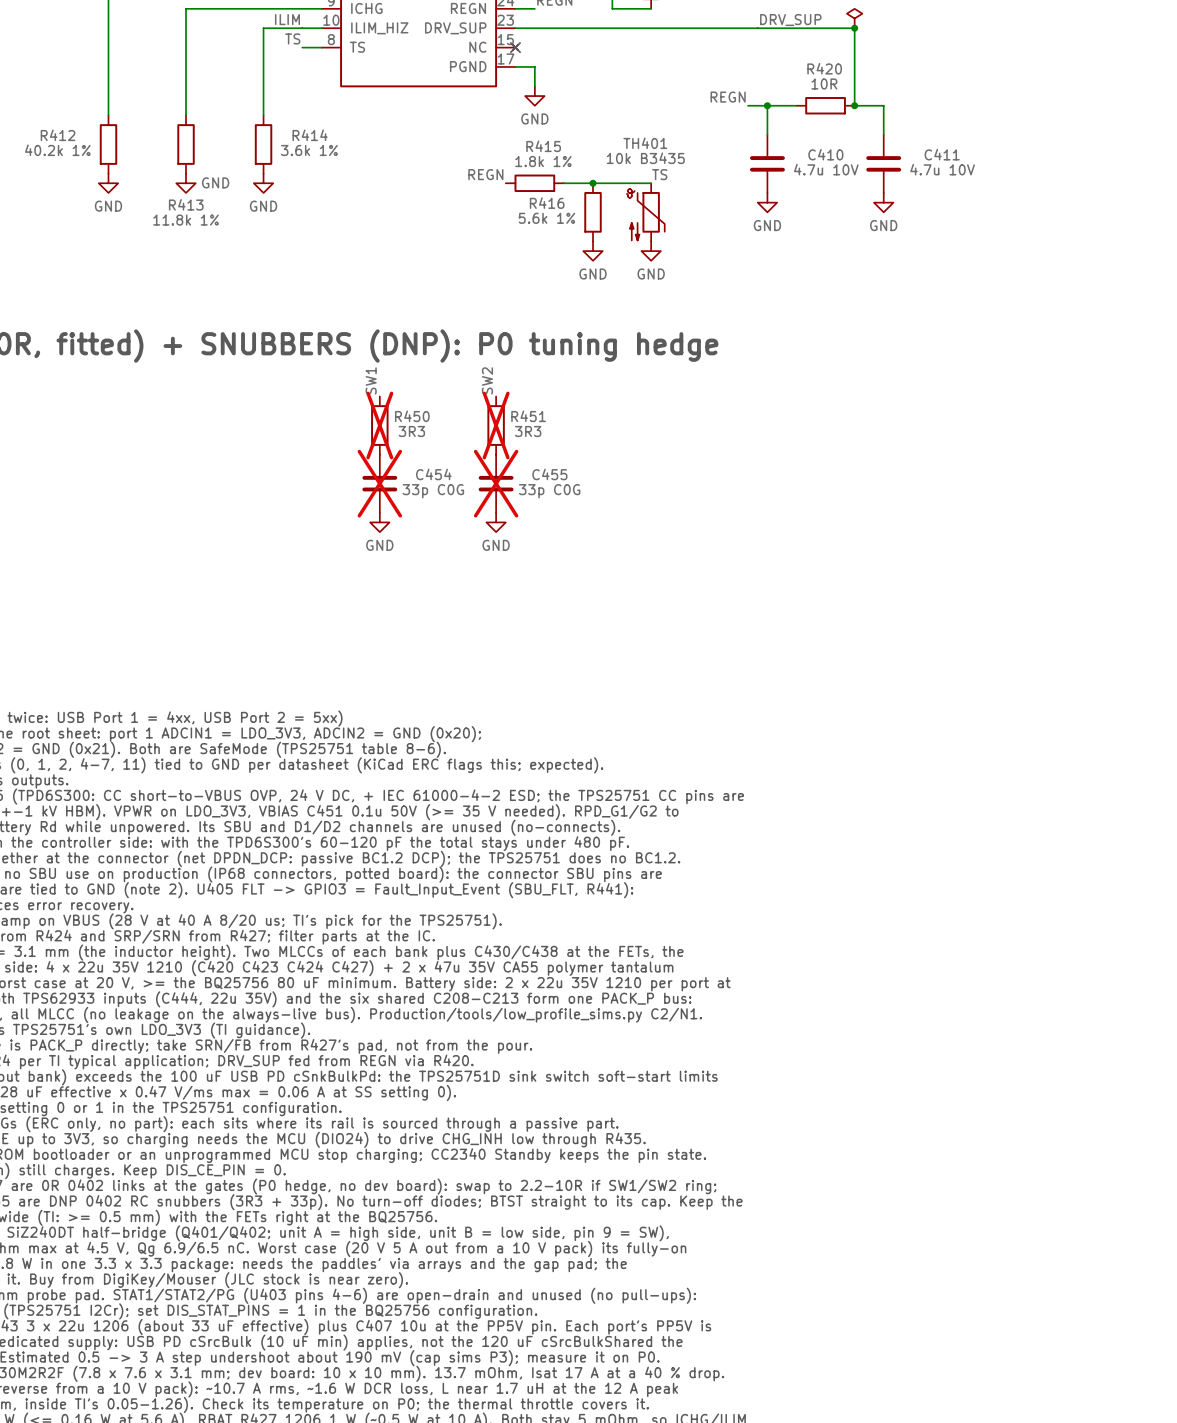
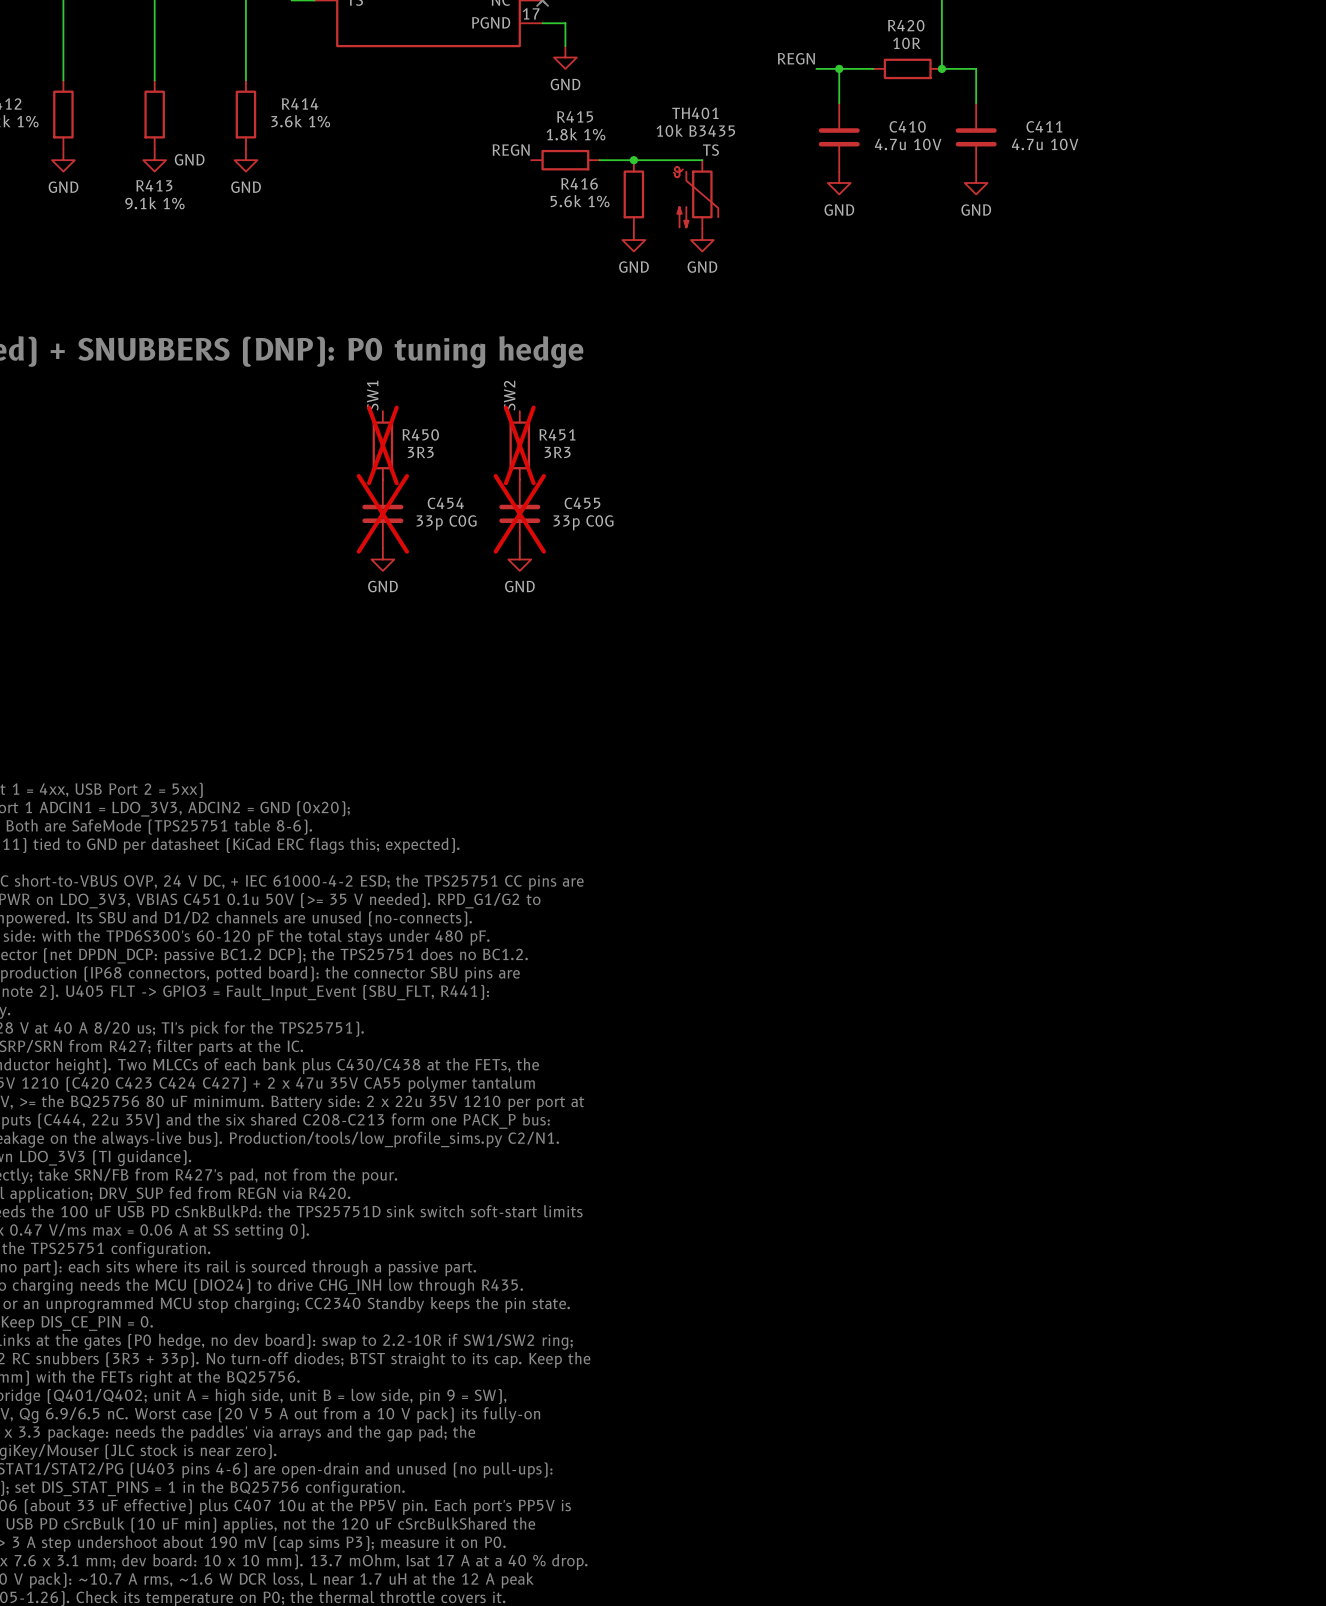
R413 value: 11.8k 1% (186, 220) -> 9.1k 1% (154, 203)

